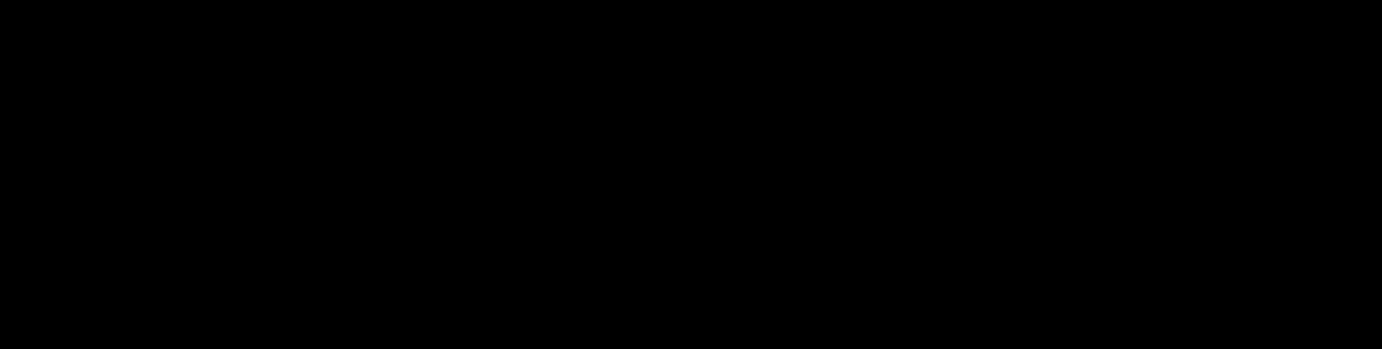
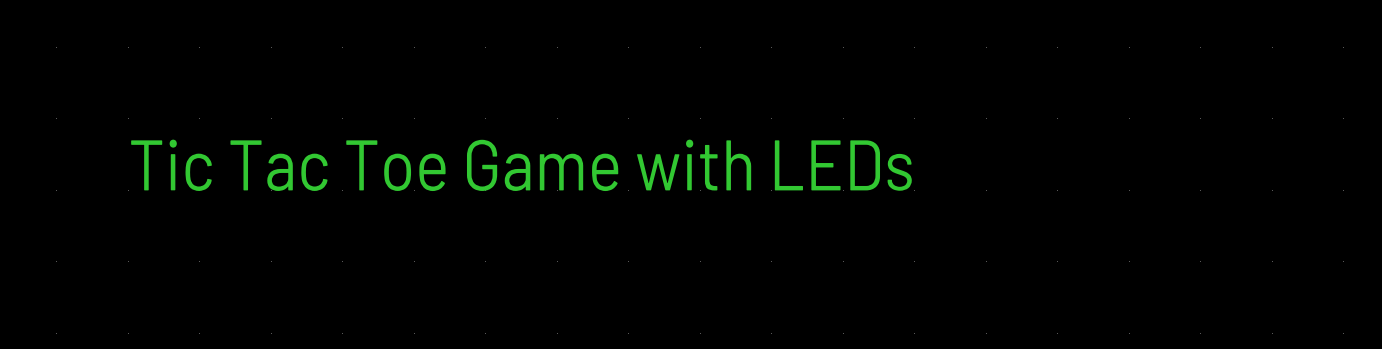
text: none -> Tic Tac Toe Game with LEDs (521, 165)

